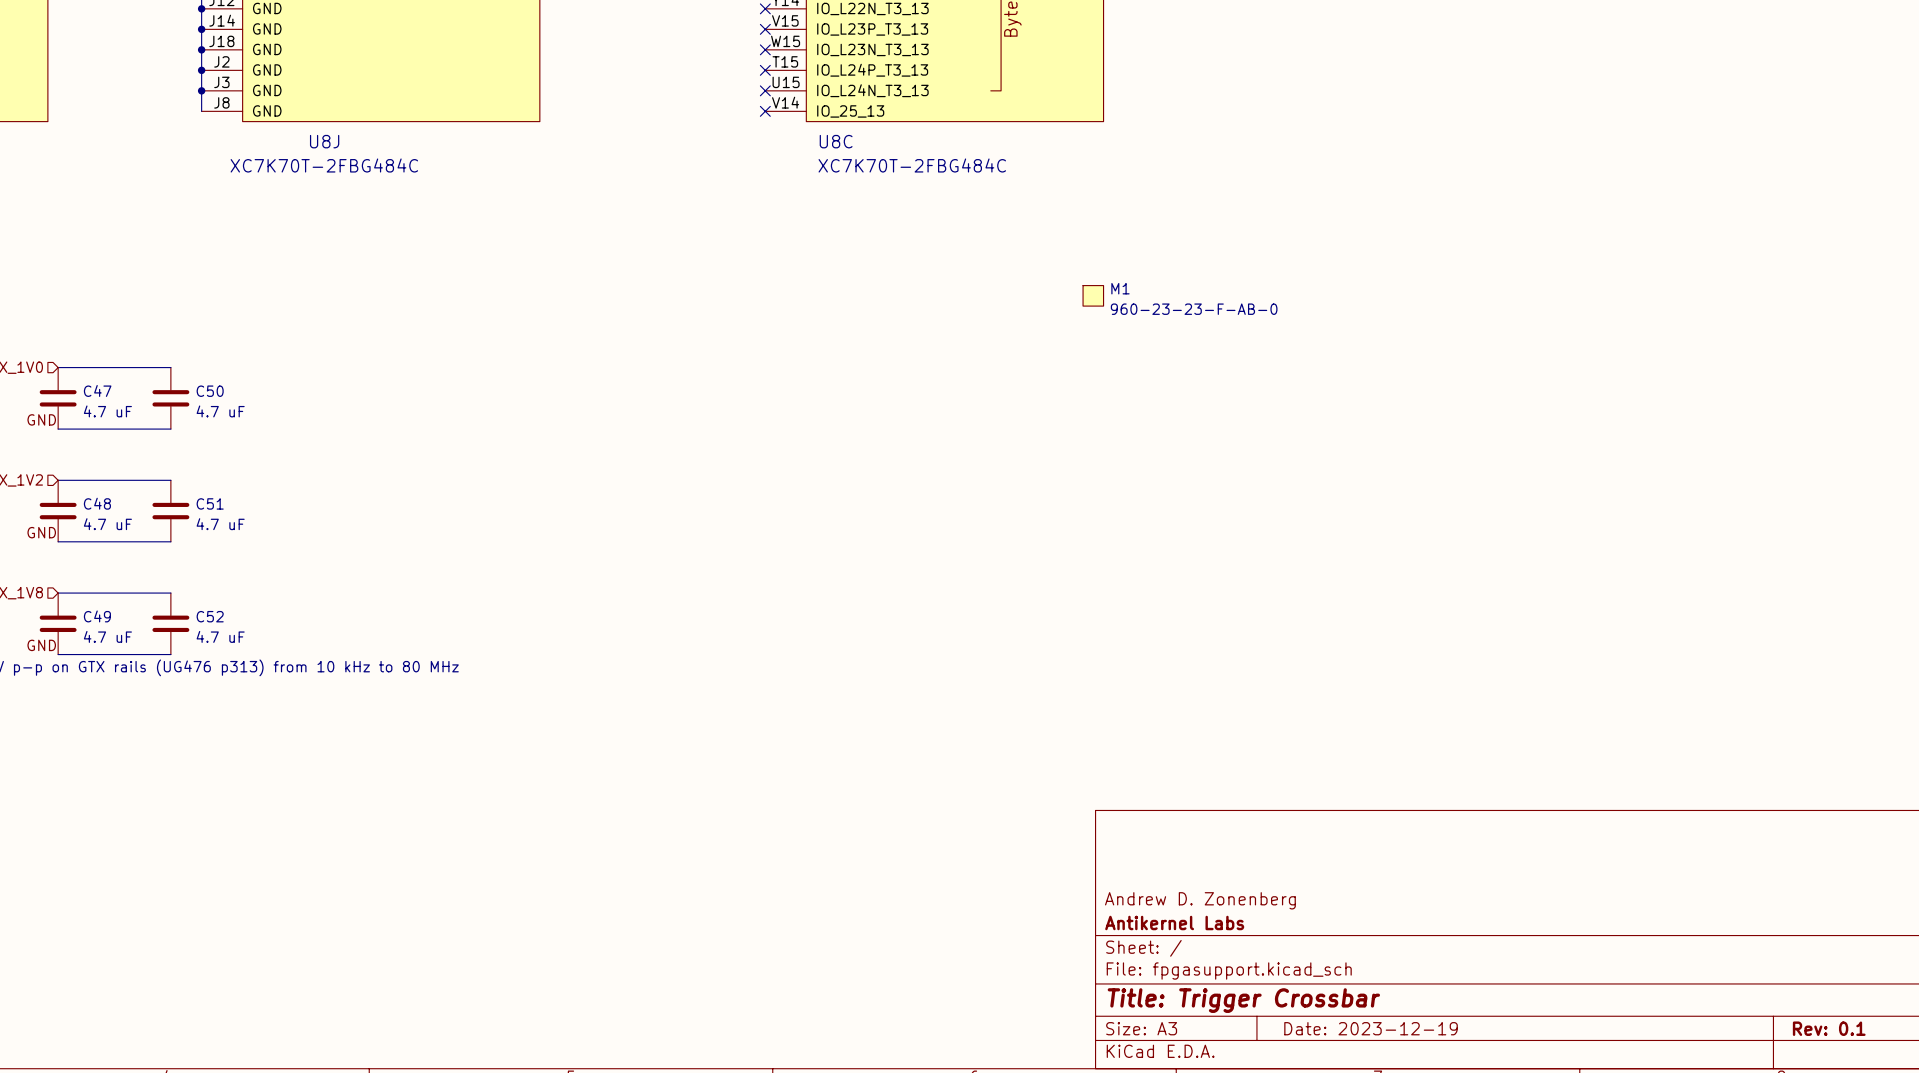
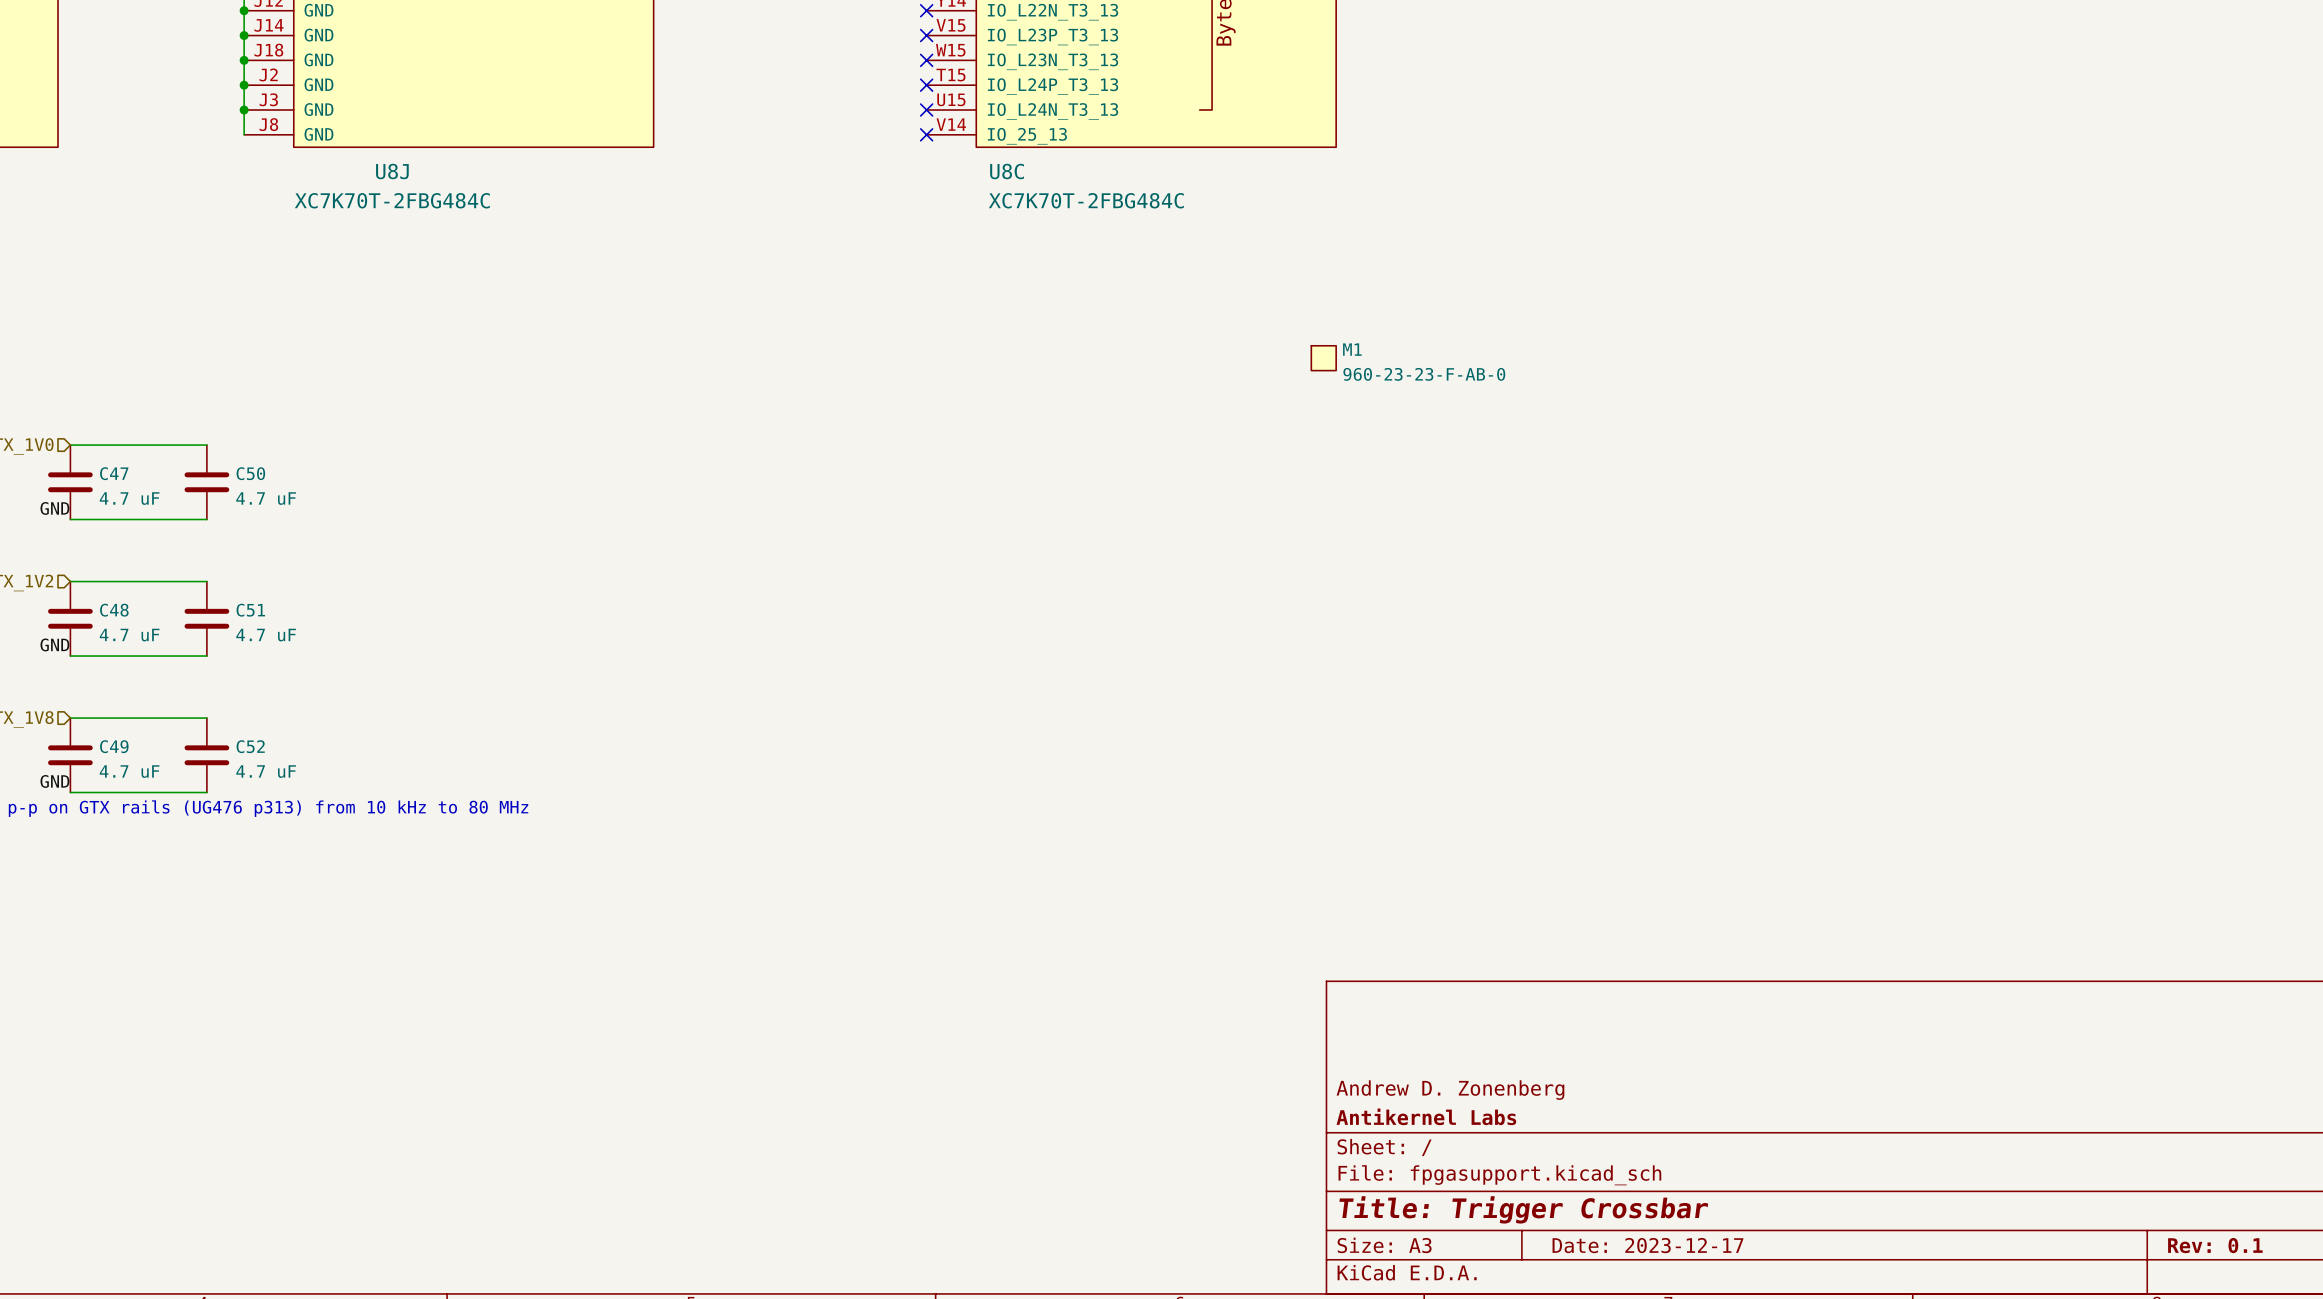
title block: Date: 2023-12-19 (1371, 1028) -> Date: 2023-12-17 (1647, 1245)

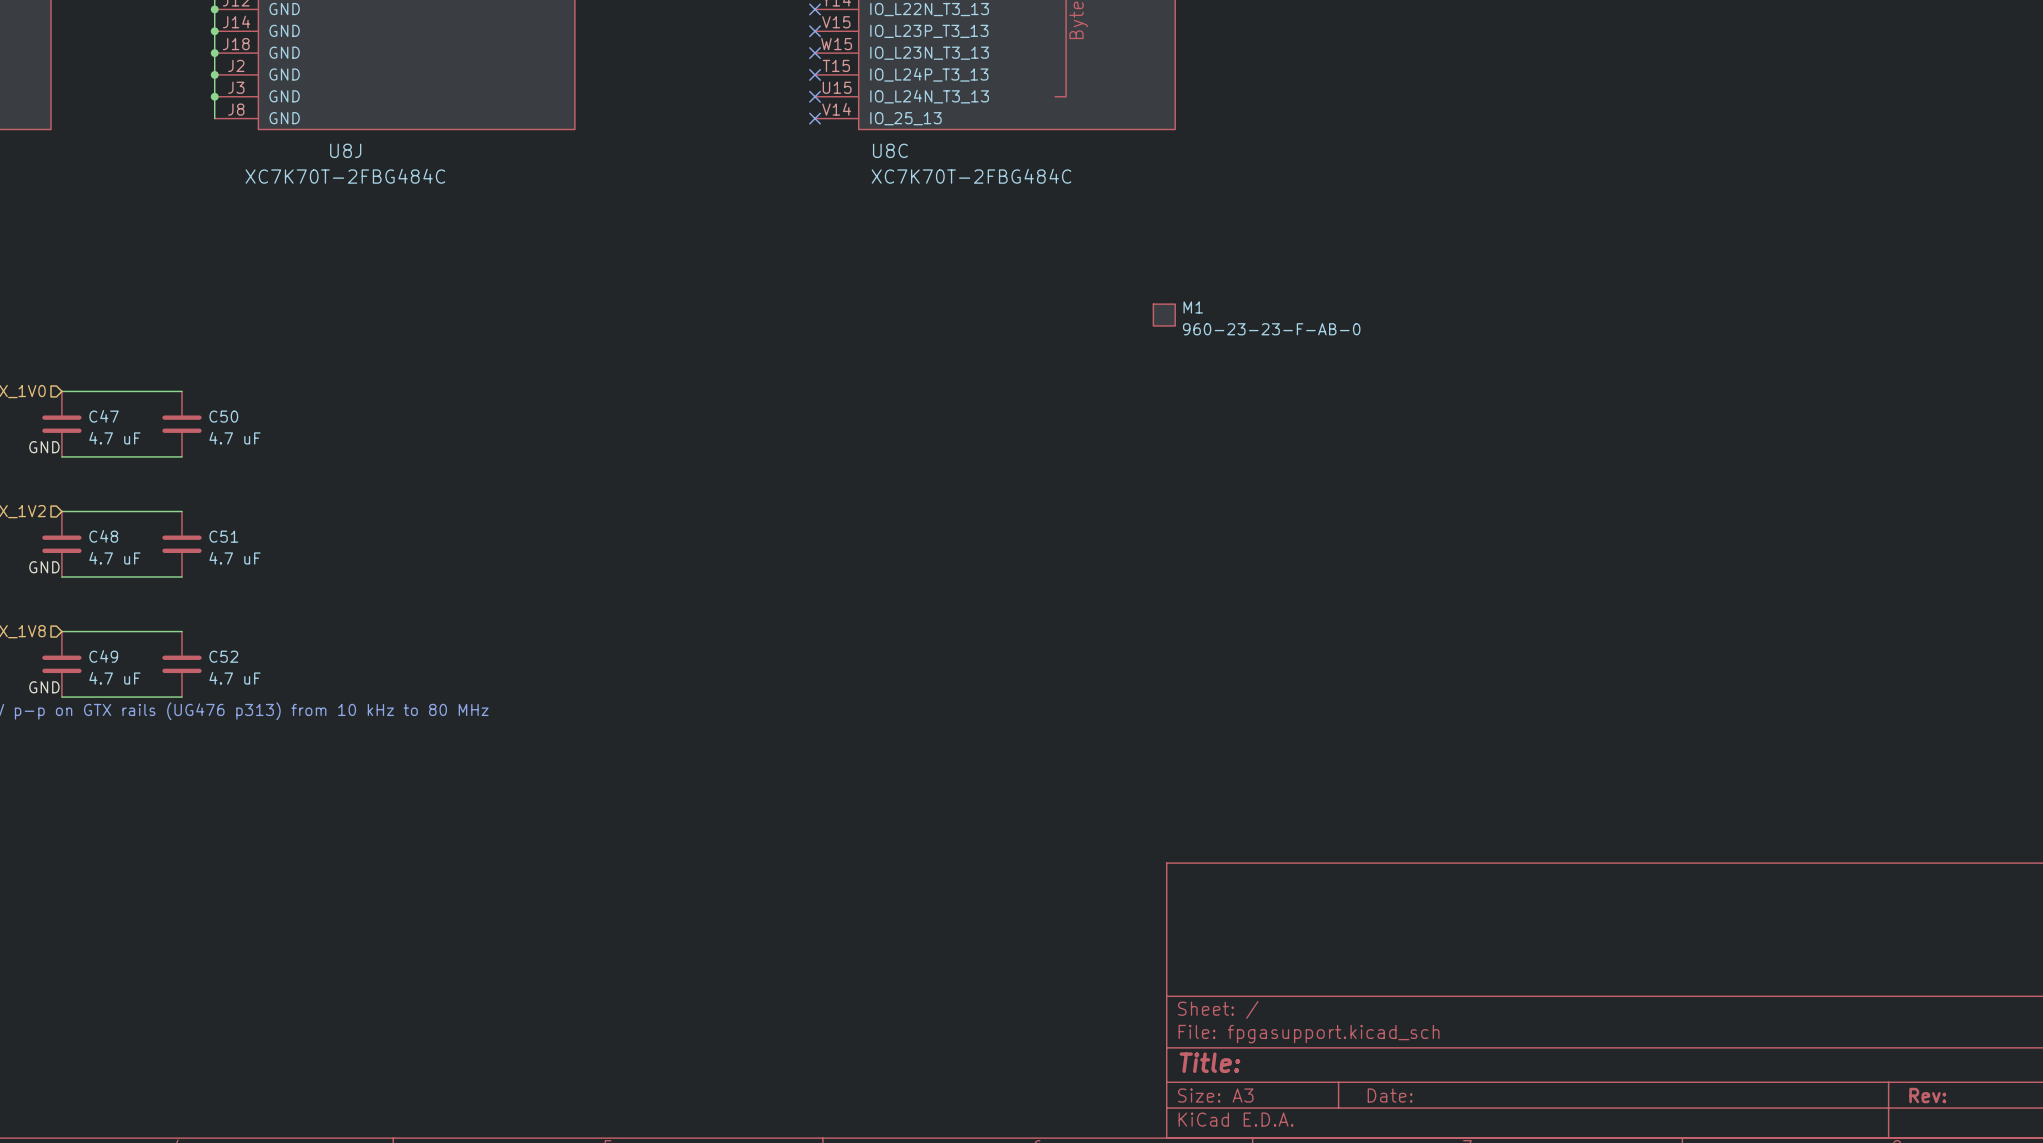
title block: Andrew D. Zonenberg (1450, 1090) -> none
title block: Antikernel Labs (1426, 1116) -> none
title block: Title: Trigger Crossbar (1523, 1209) -> Title: (1209, 1062)
title block: Date: 2023-12-17 (1647, 1245) -> Date: (1390, 1095)
title block: Rev: 0.1 (2215, 1245) -> Rev: (1927, 1095)

